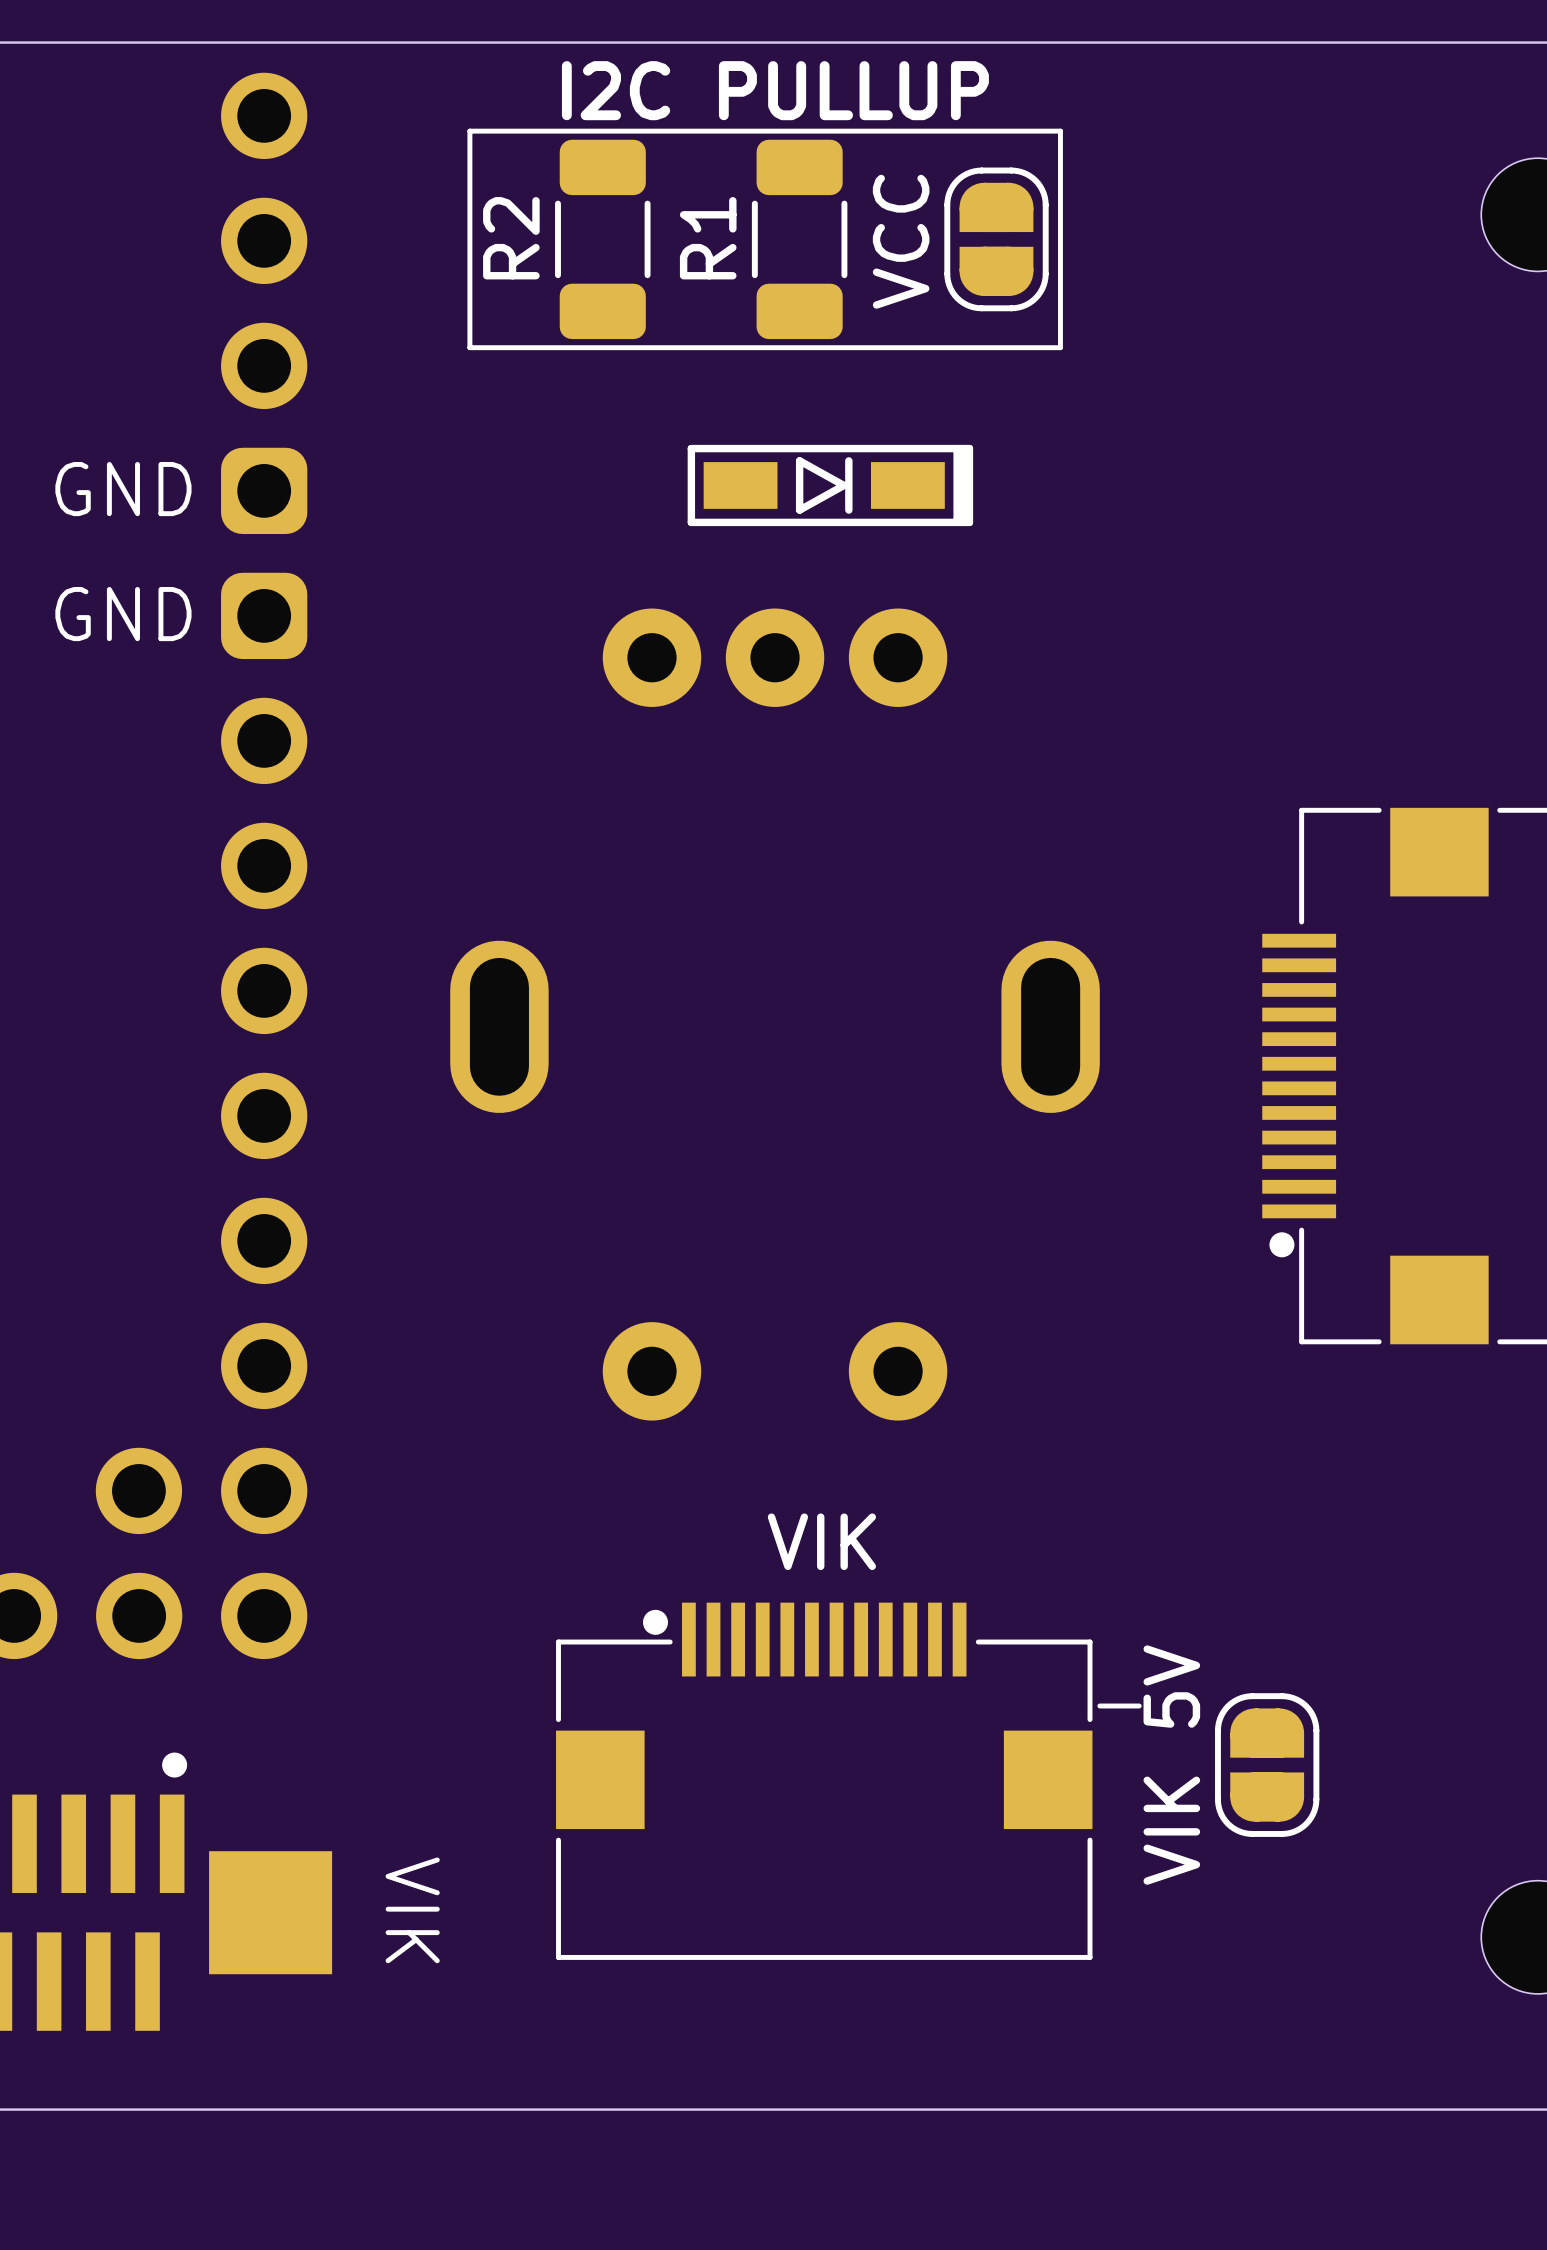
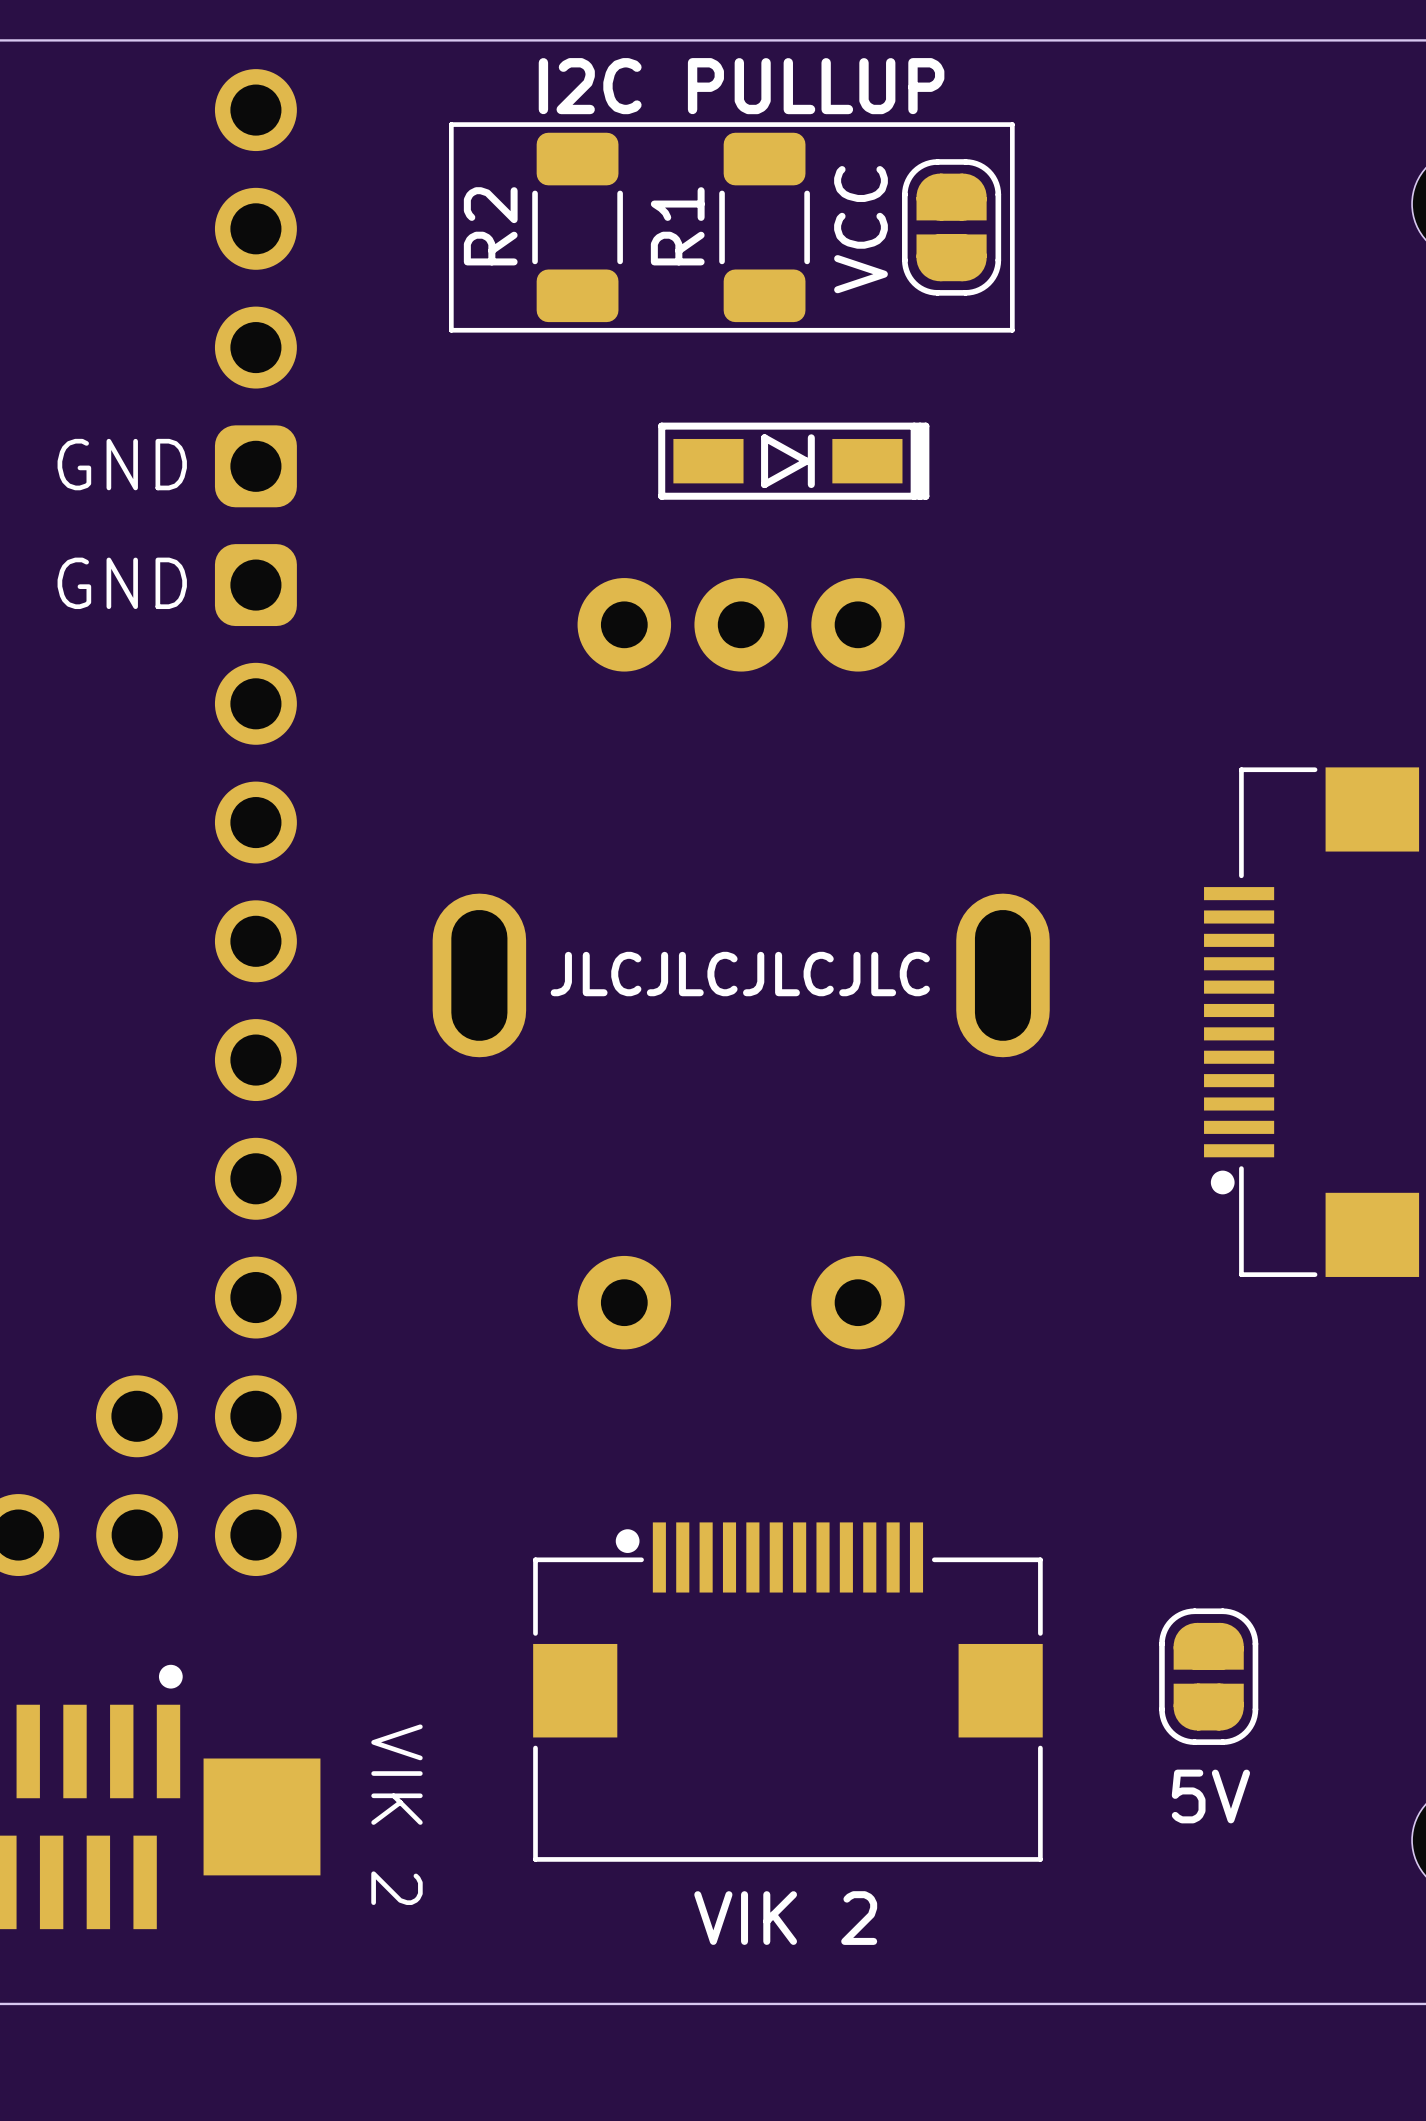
text: none -> JLCJLCJLCJLC (740, 974)
part text: VIK (821, 1541) -> none
line: (1099, 1706) (1139, 1706) -> none
part value: VIK 5V (1171, 1765) -> 5V (1210, 1796)
part text: VIK (412, 1910) -> VIK 2 (396, 1814)
part text: none -> VIK 2 (785, 1918)

